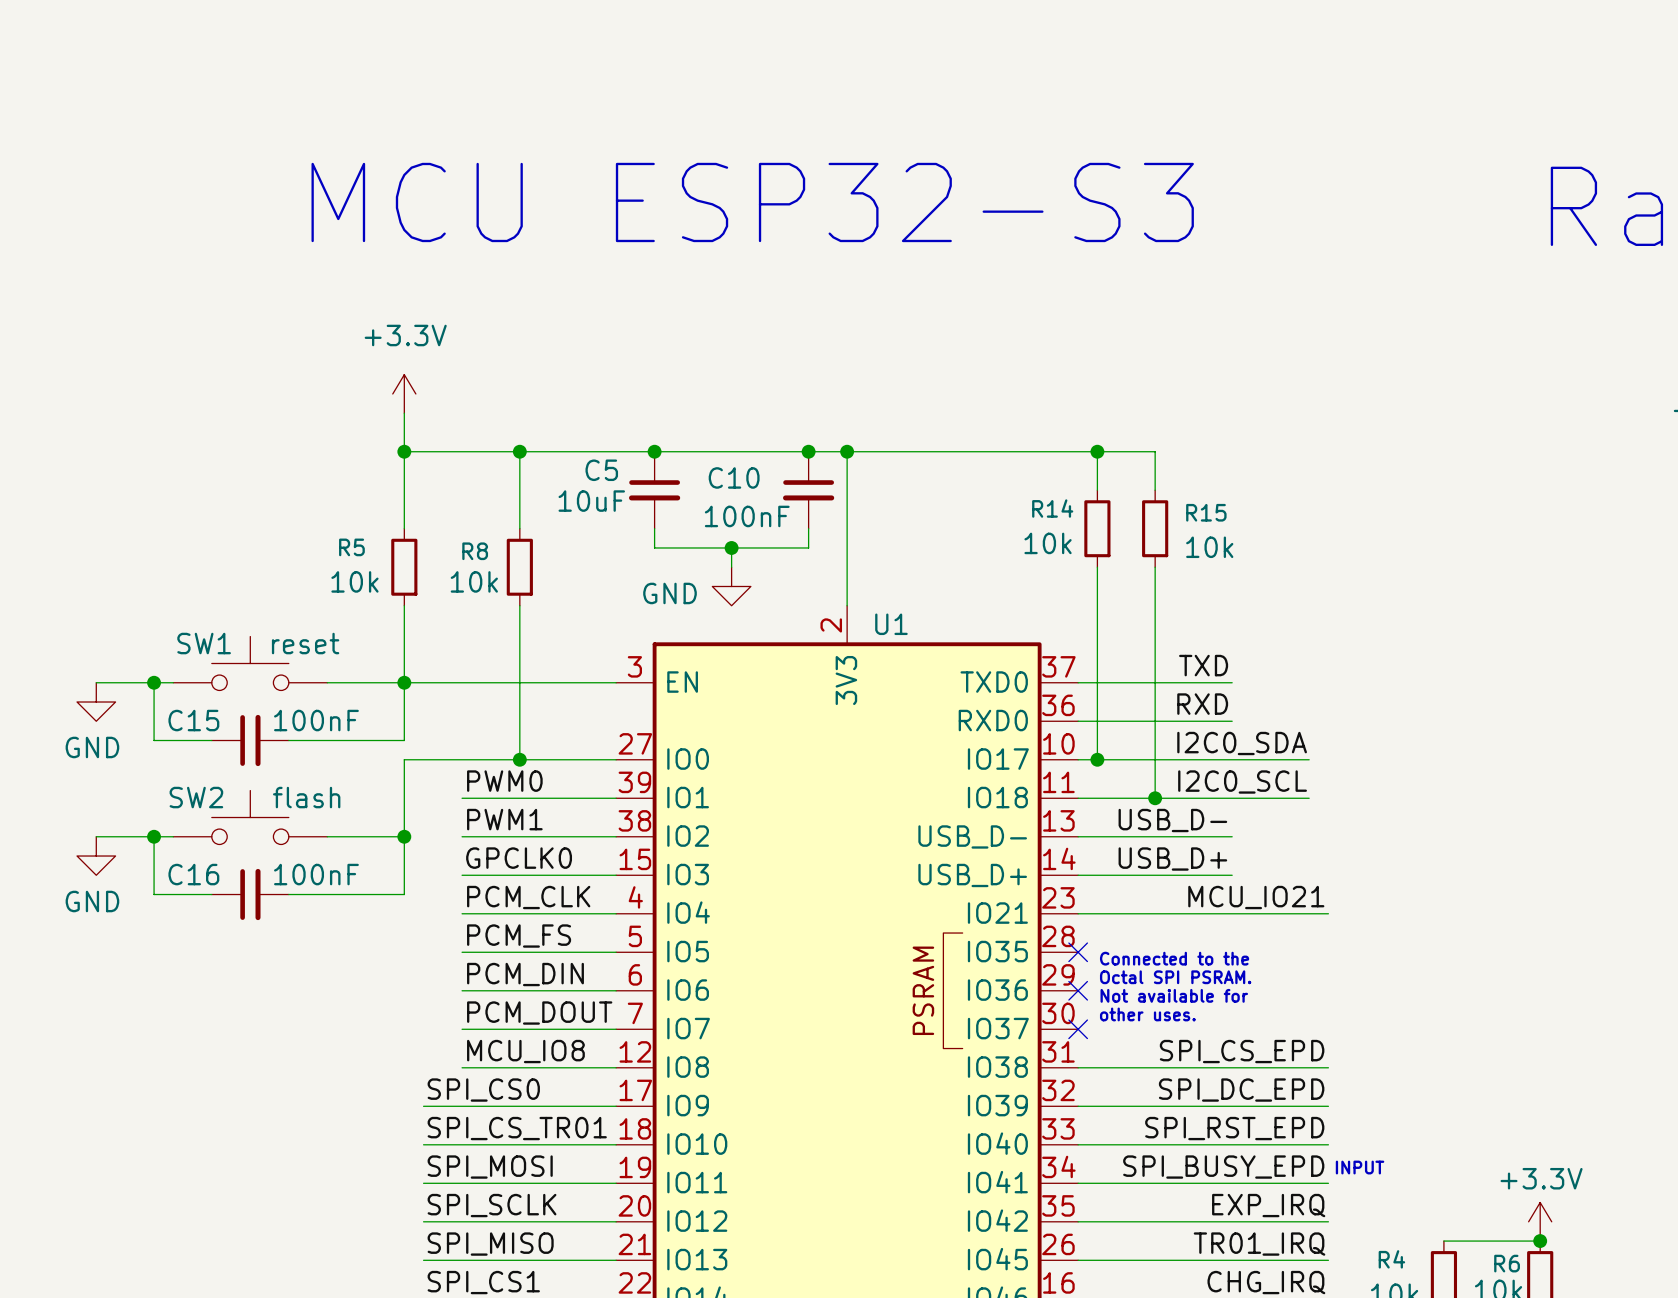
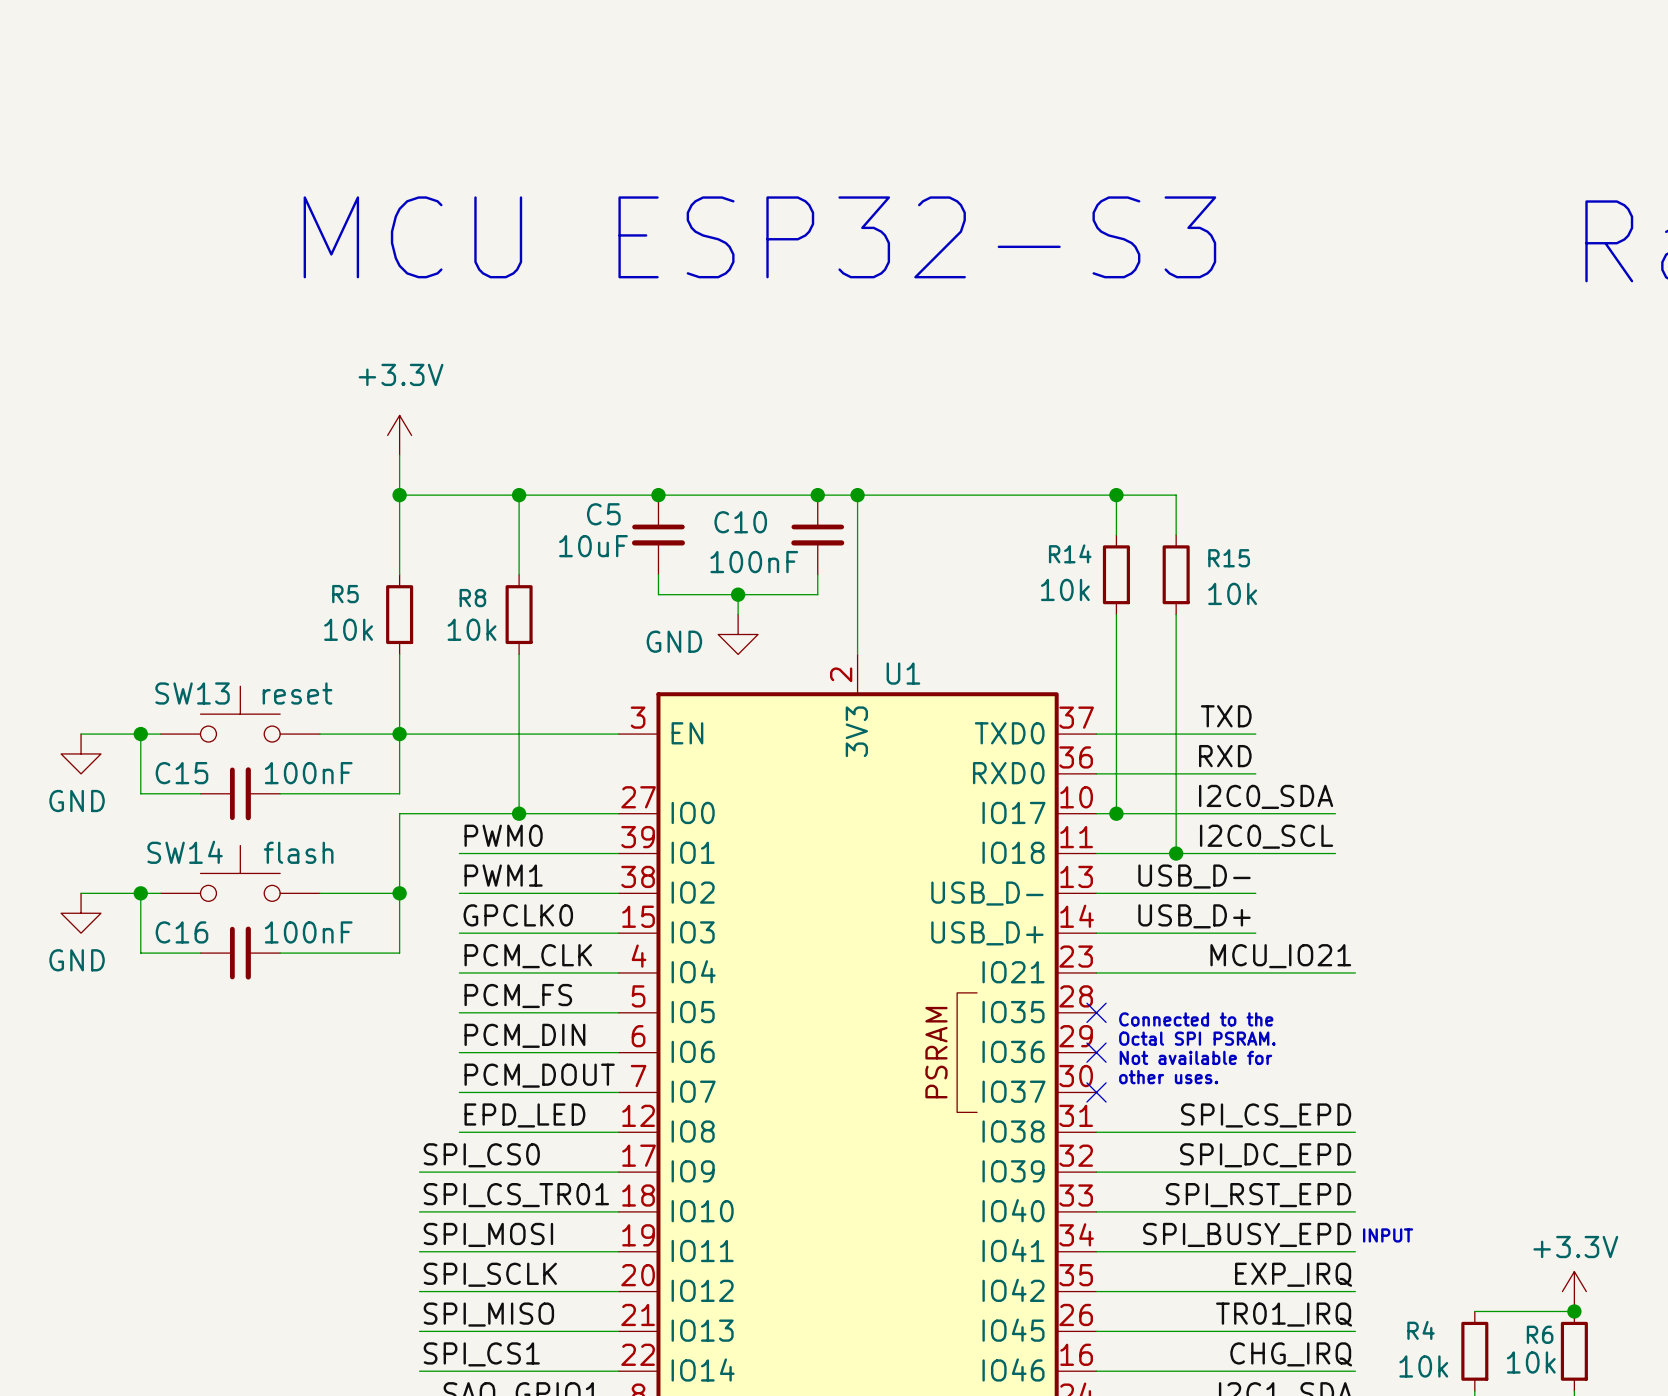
SW1 name: SW1 (204, 643) -> SW13 (192, 693)
SW2 name: SW2 (196, 797) -> SW14 (185, 852)
label: MCU_IO8 (525, 1051) -> EPD_LED (524, 1115)

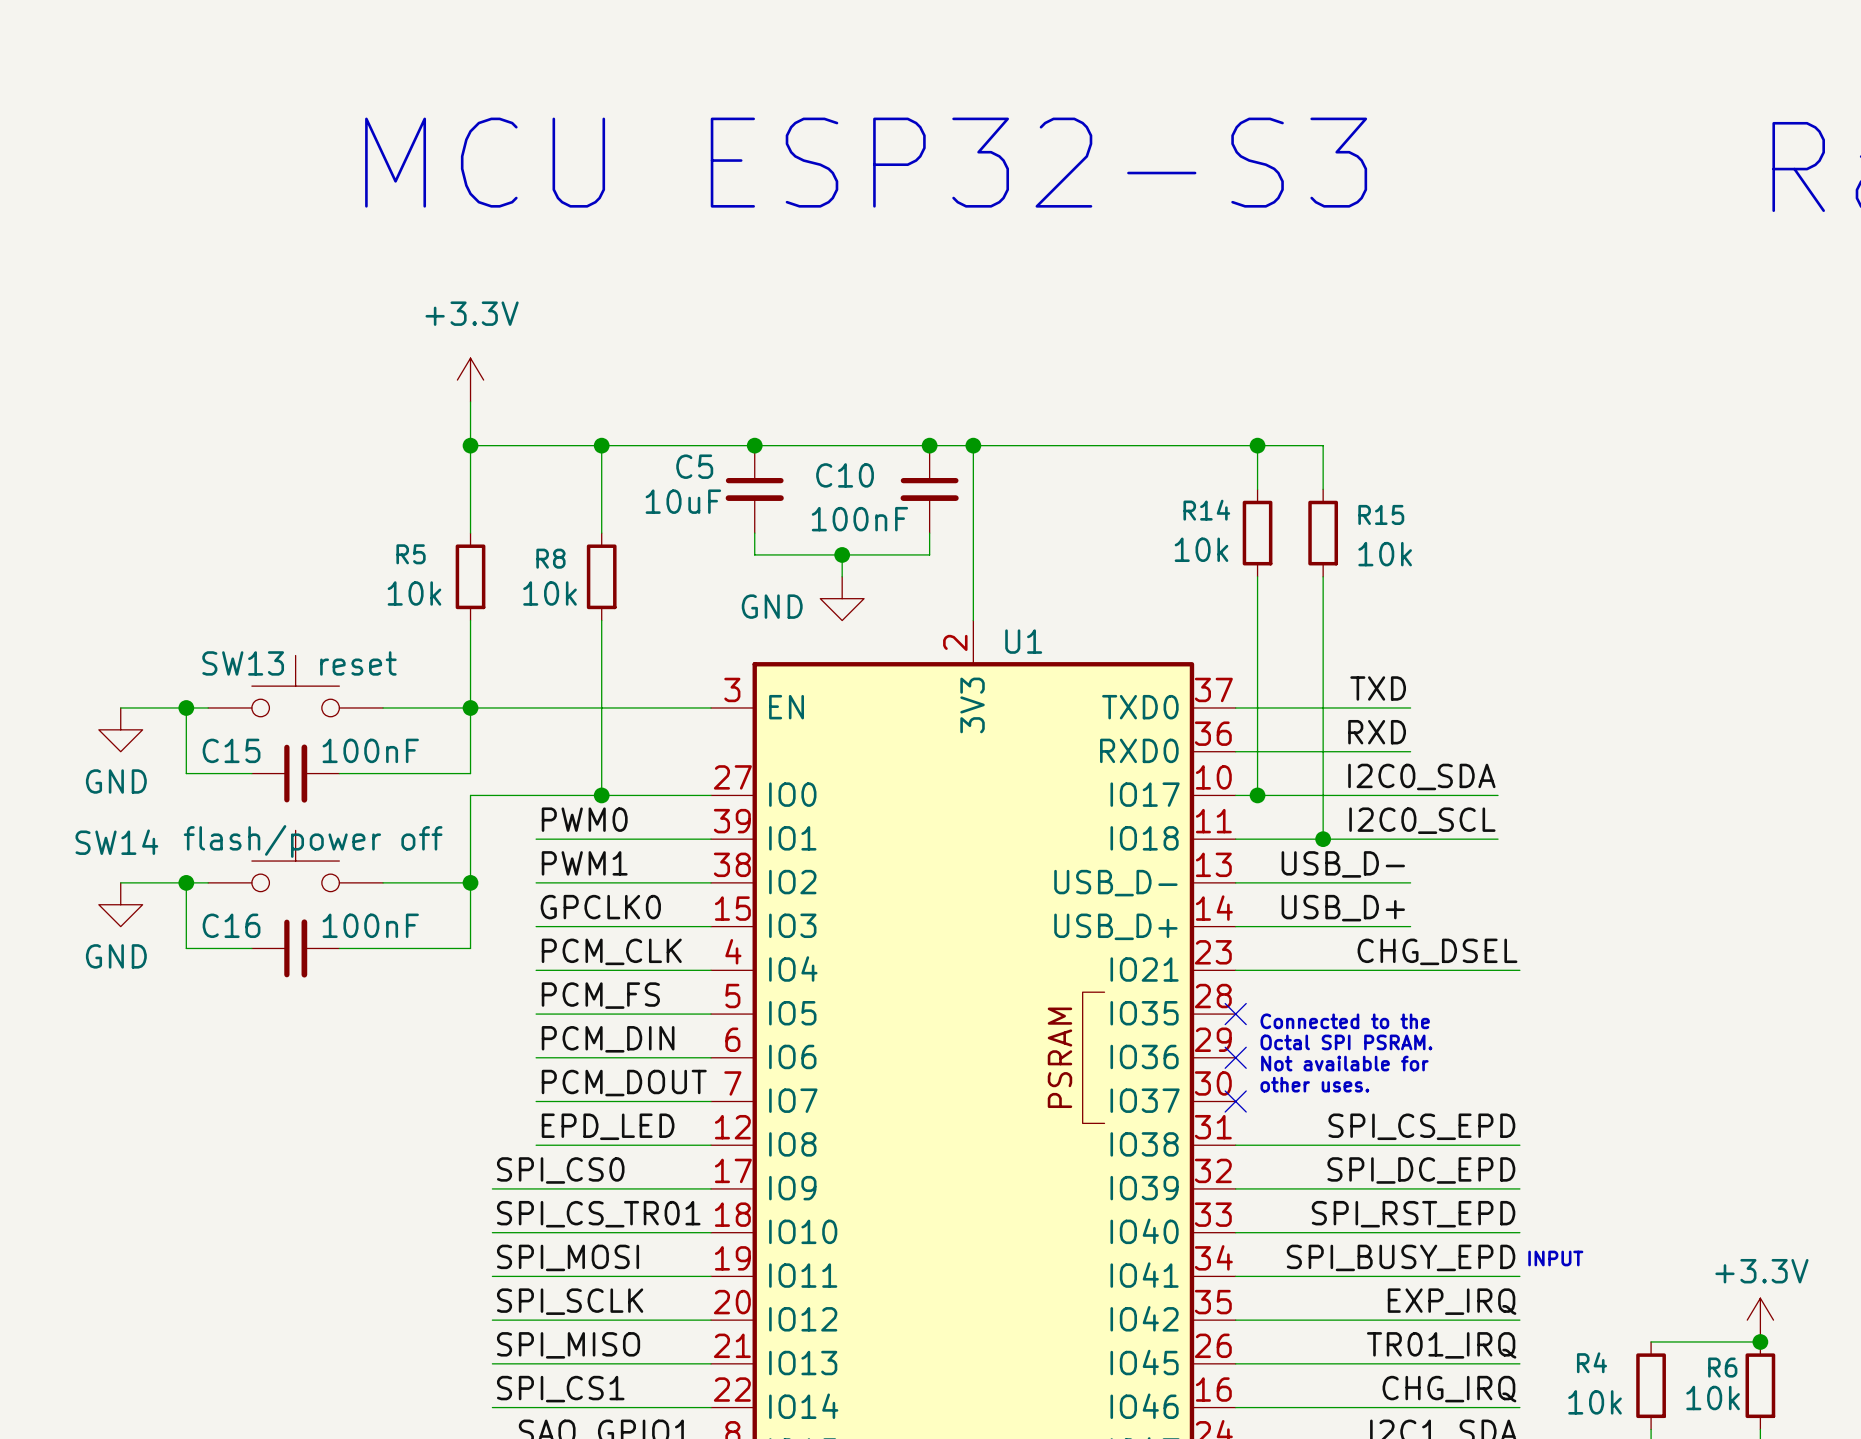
SW14 name position: SW14 (185, 852) -> SW14 (116, 842)
SW14 value: flash (298, 852) -> flash/power off (313, 841)
label: MCU_IO21 (1280, 956) -> CHG_DSEL (1437, 951)

